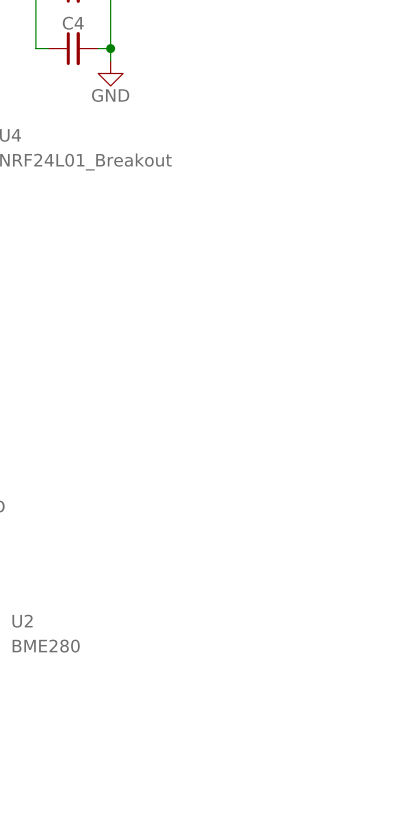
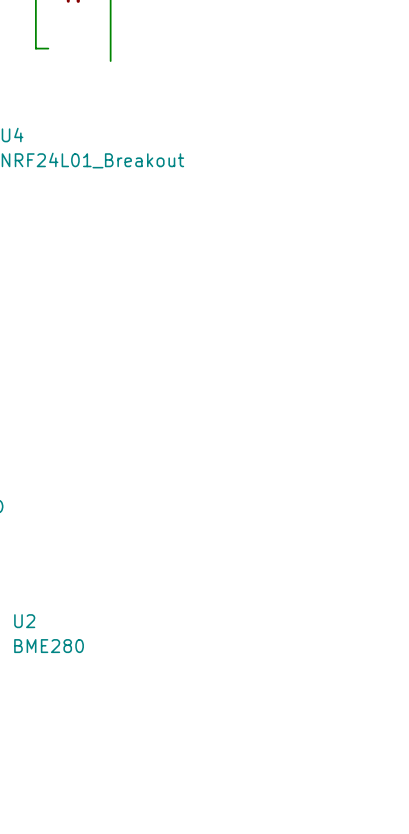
C4: (73, 48) -> none
wire: (98, 48) (110, 48) -> none
junction: (110, 48) -> none
power symbol: GND (110, 73) -> none

